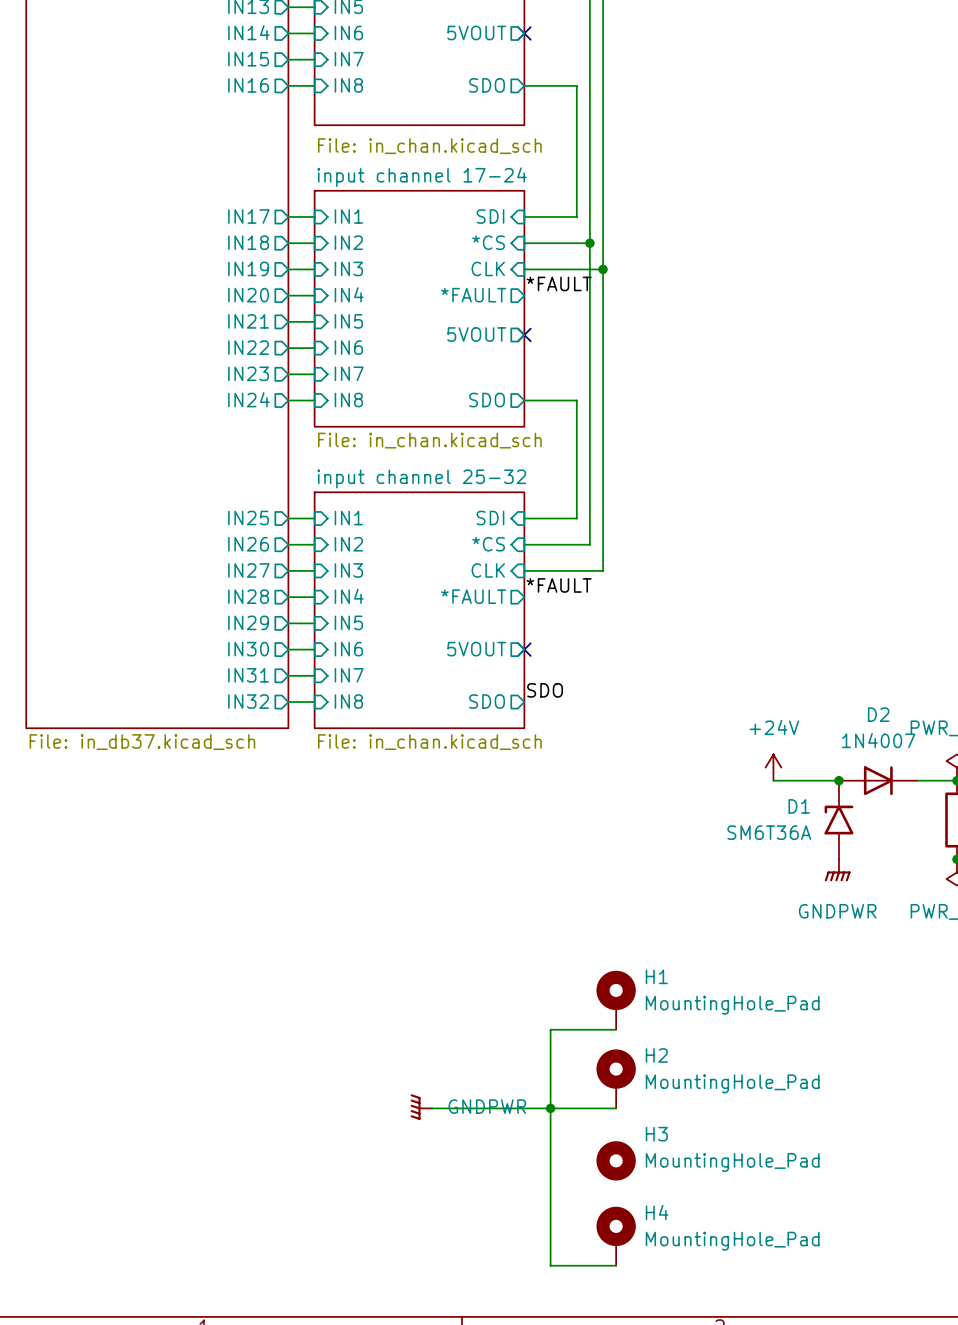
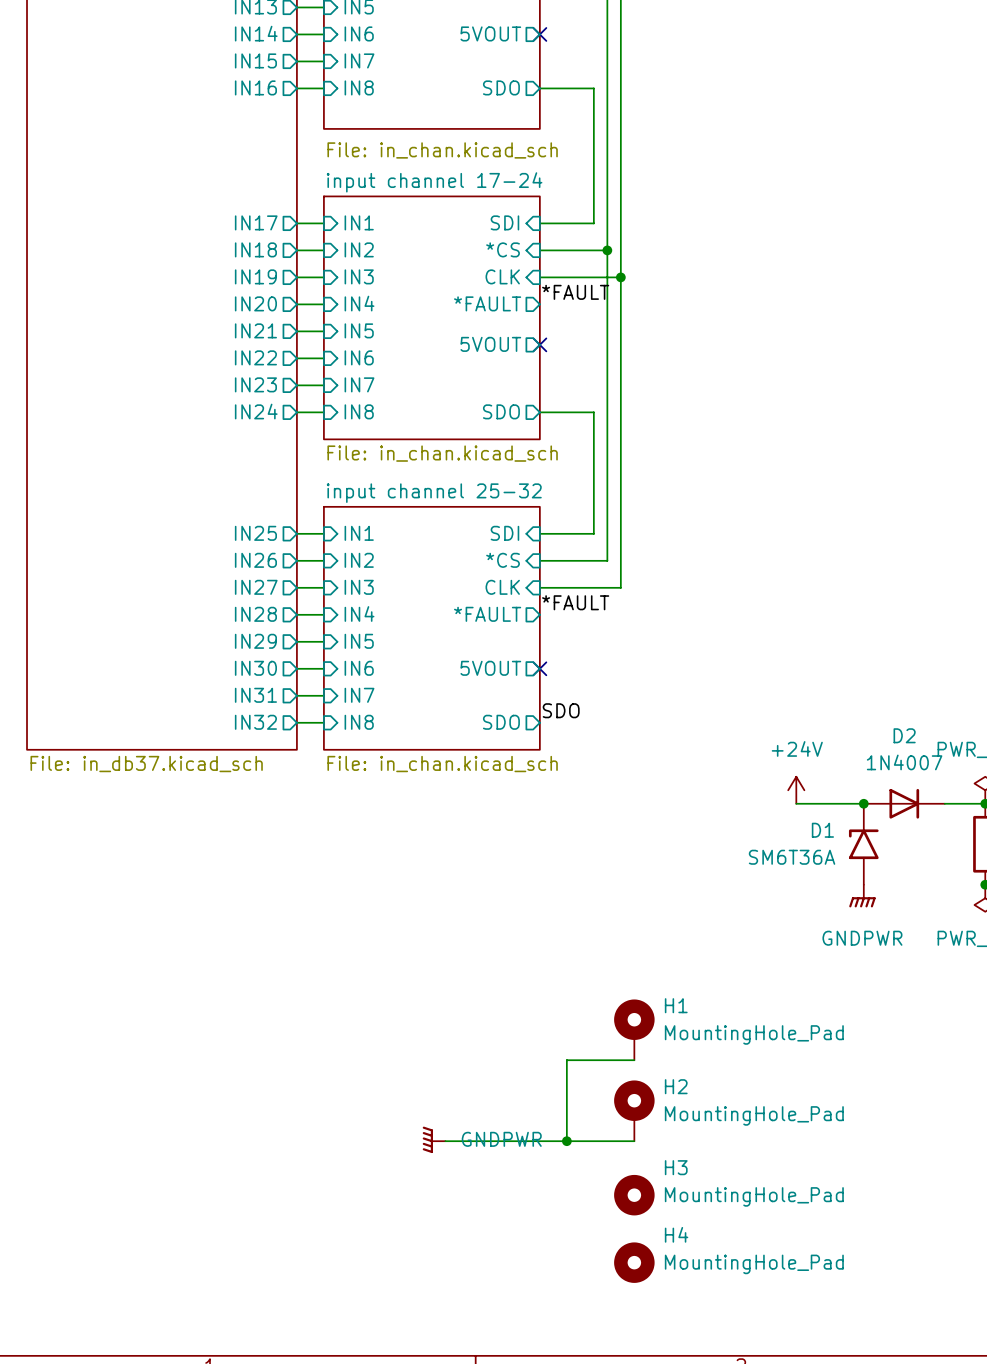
wire: (550, 1108) (550, 1265) (616, 1265) -> none
H4 symbol: [596, 1206, 636, 1266] -> [614, 1242, 655, 1283]

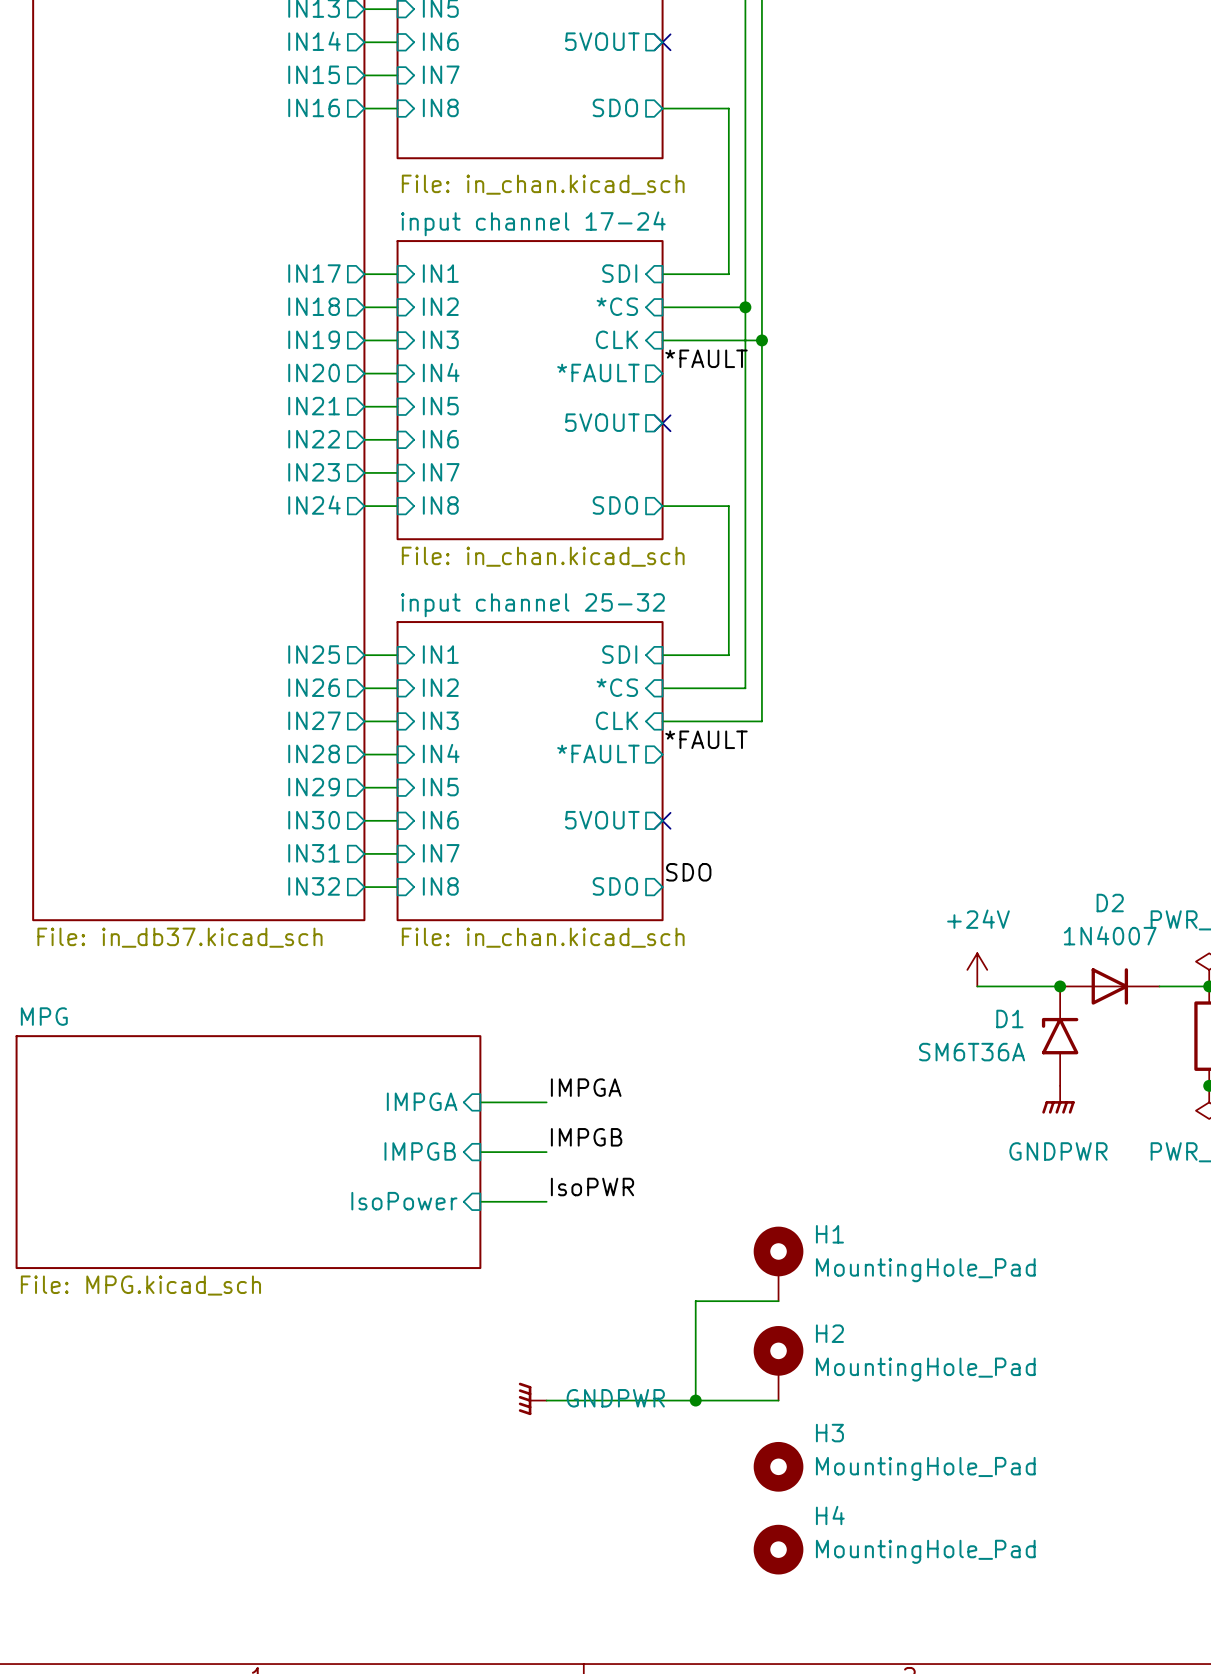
label: none -> IMPGA (586, 1087)
sheet pin: none -> IMPGA (422, 1101)
wire: none -> (480, 1102) (546, 1102)
label: none -> IMPGB (586, 1137)
sheet MPG: none -> File: MPG.kicad_sch (248, 1152)
sheet pin: none -> IMPGB (420, 1151)
wire: none -> (480, 1152) (546, 1152)
label: none -> IsoPWR (592, 1187)
sheet pin: none -> IsoPower (404, 1201)
wire: none -> (480, 1201) (546, 1201)

